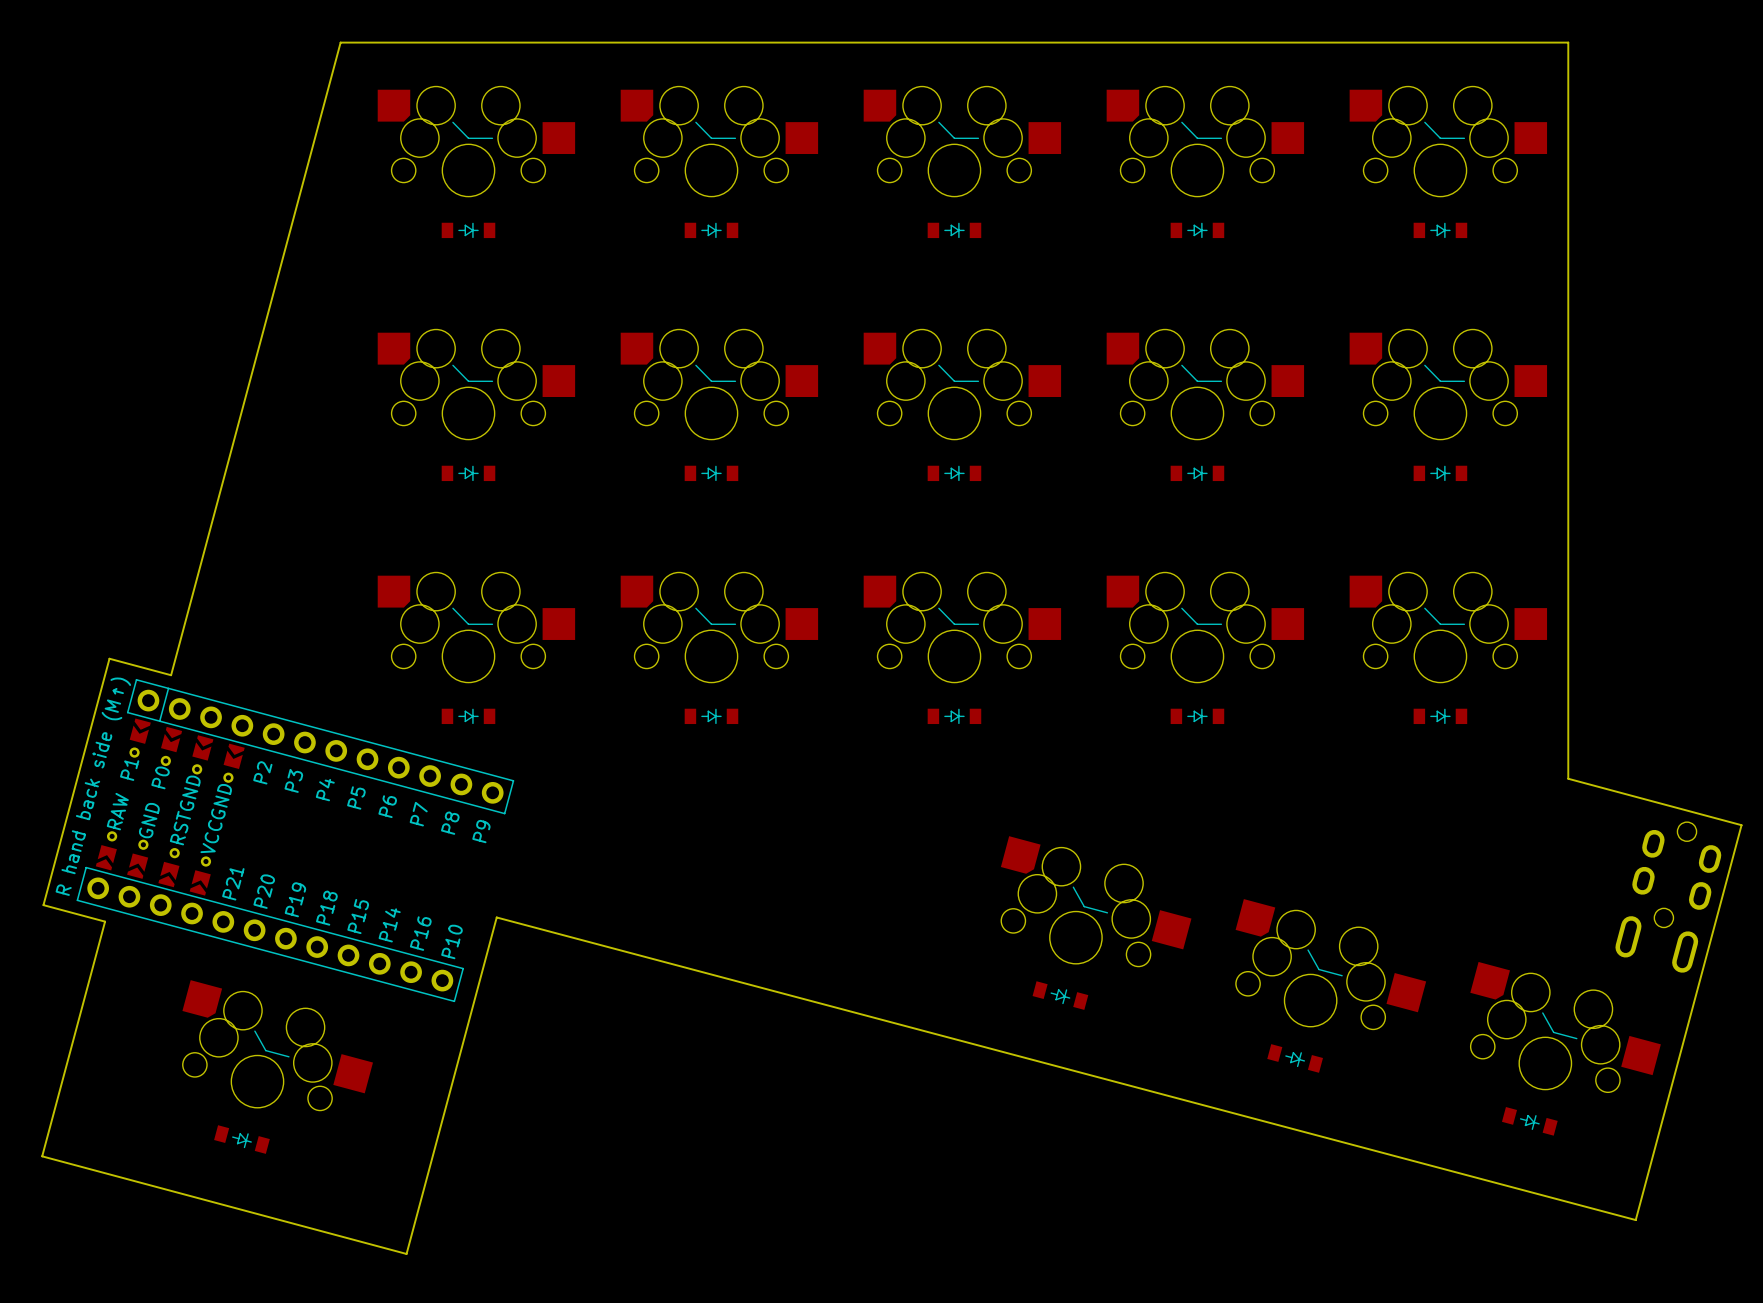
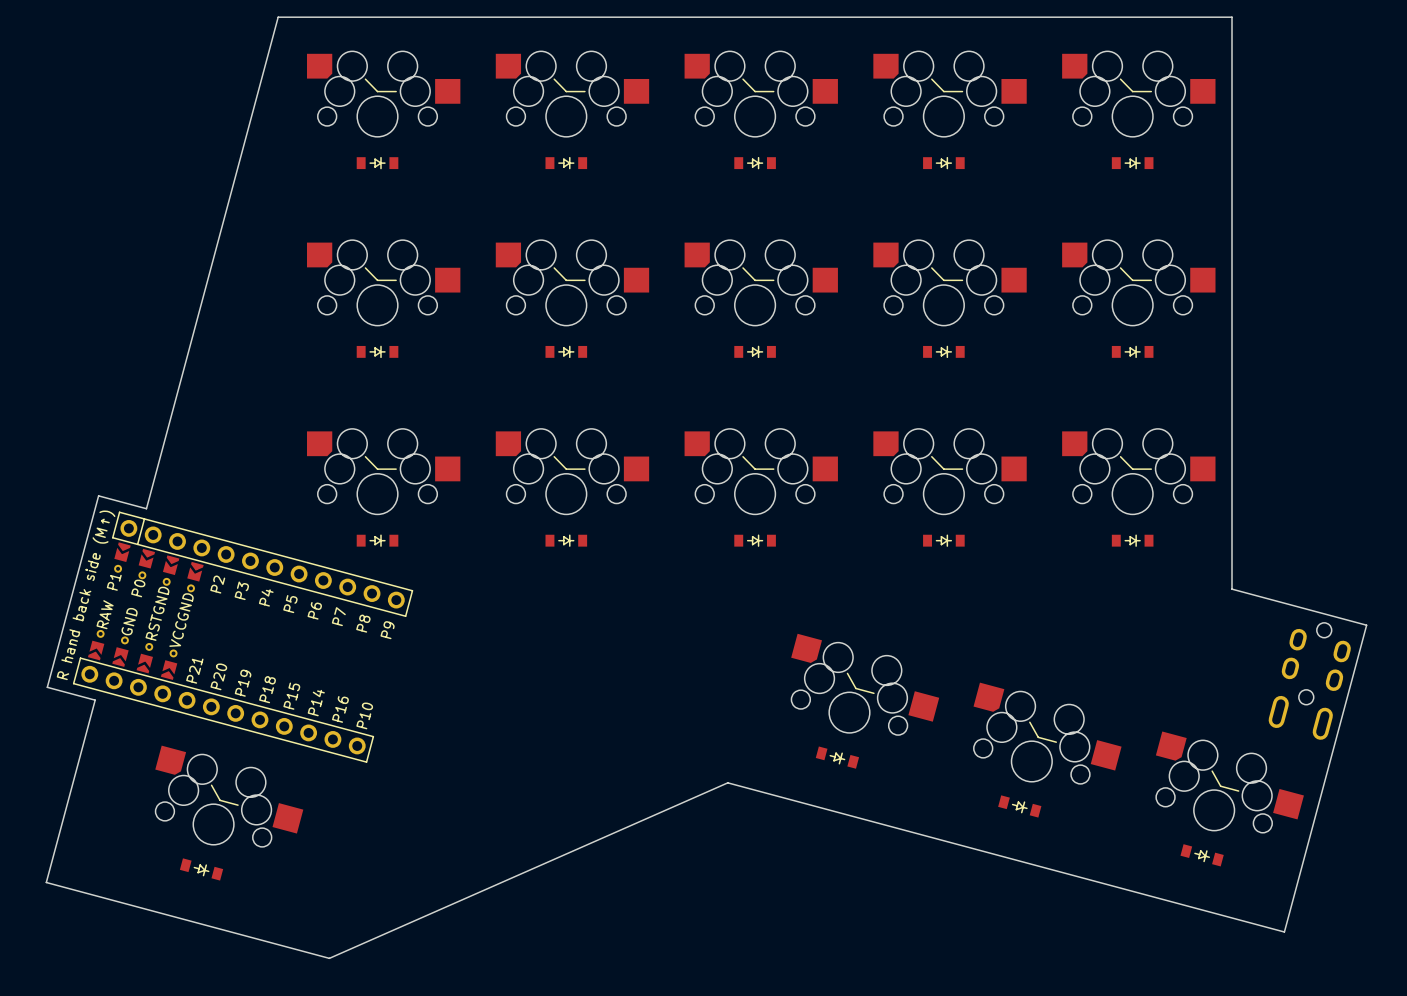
board edge: (1635, 1220) (496, 917) (406, 1253) -> (1284, 932) (727, 782) (329, 958)

